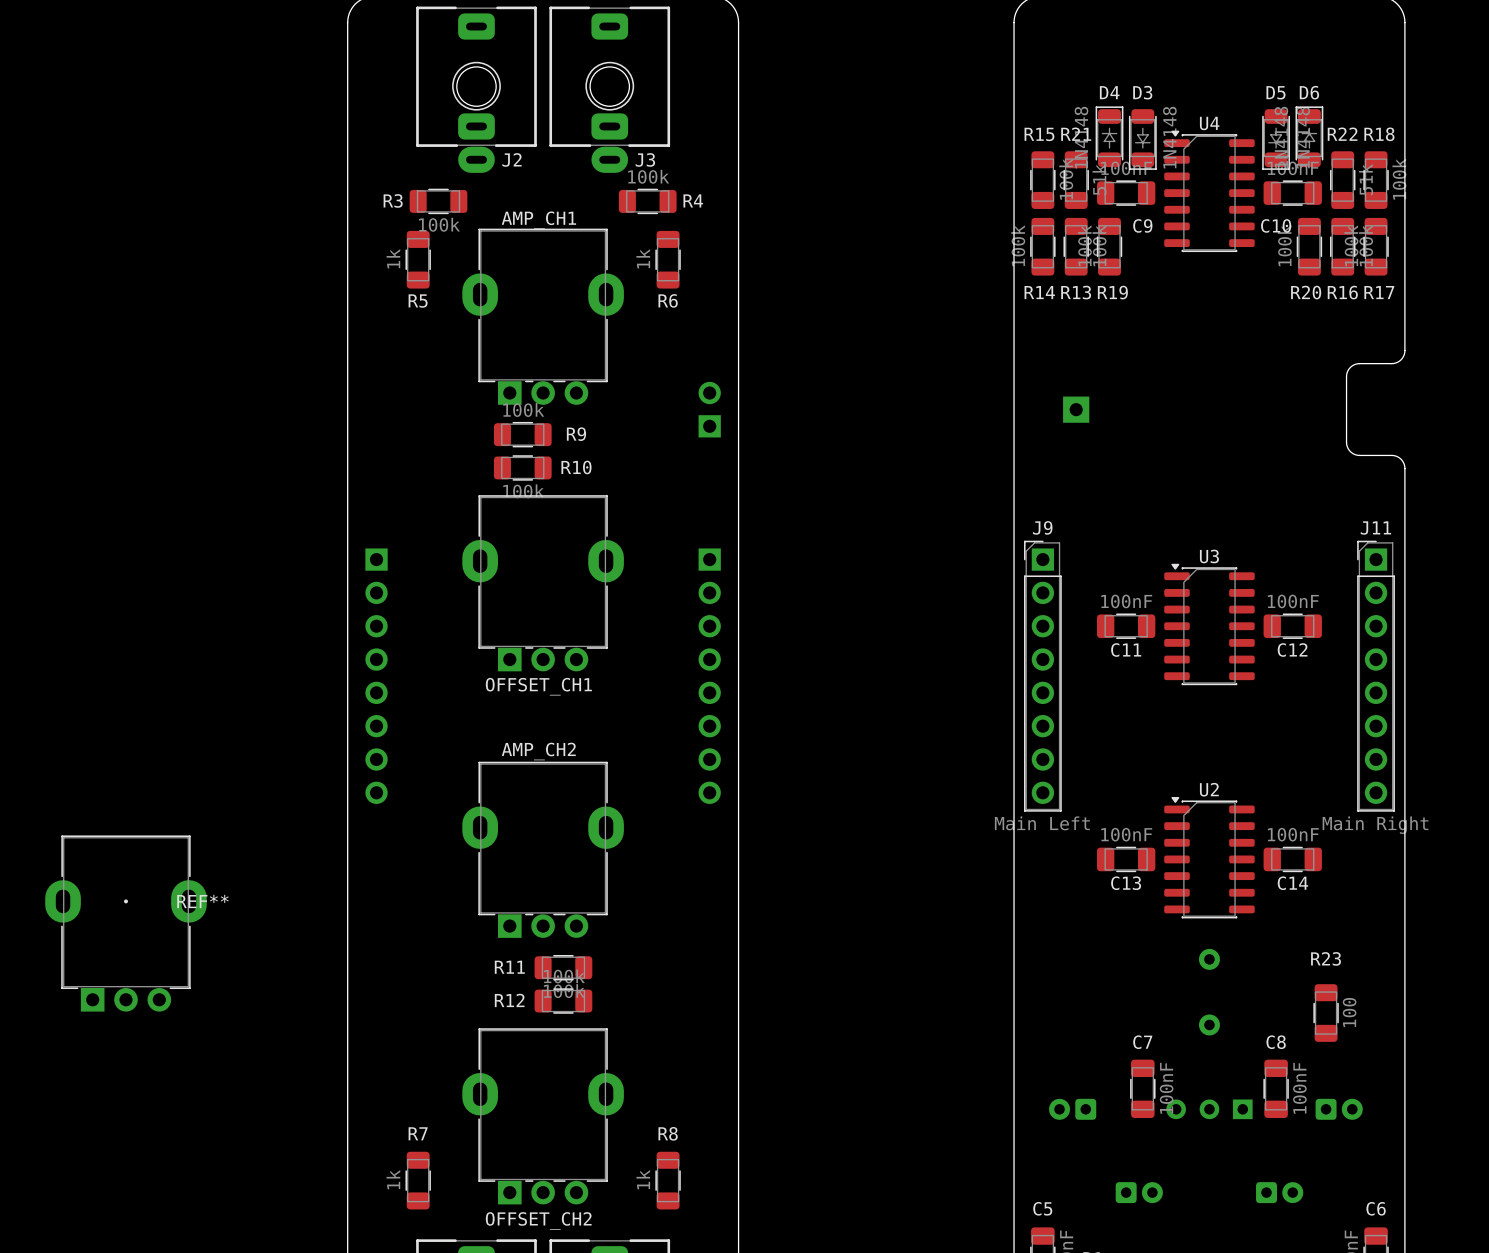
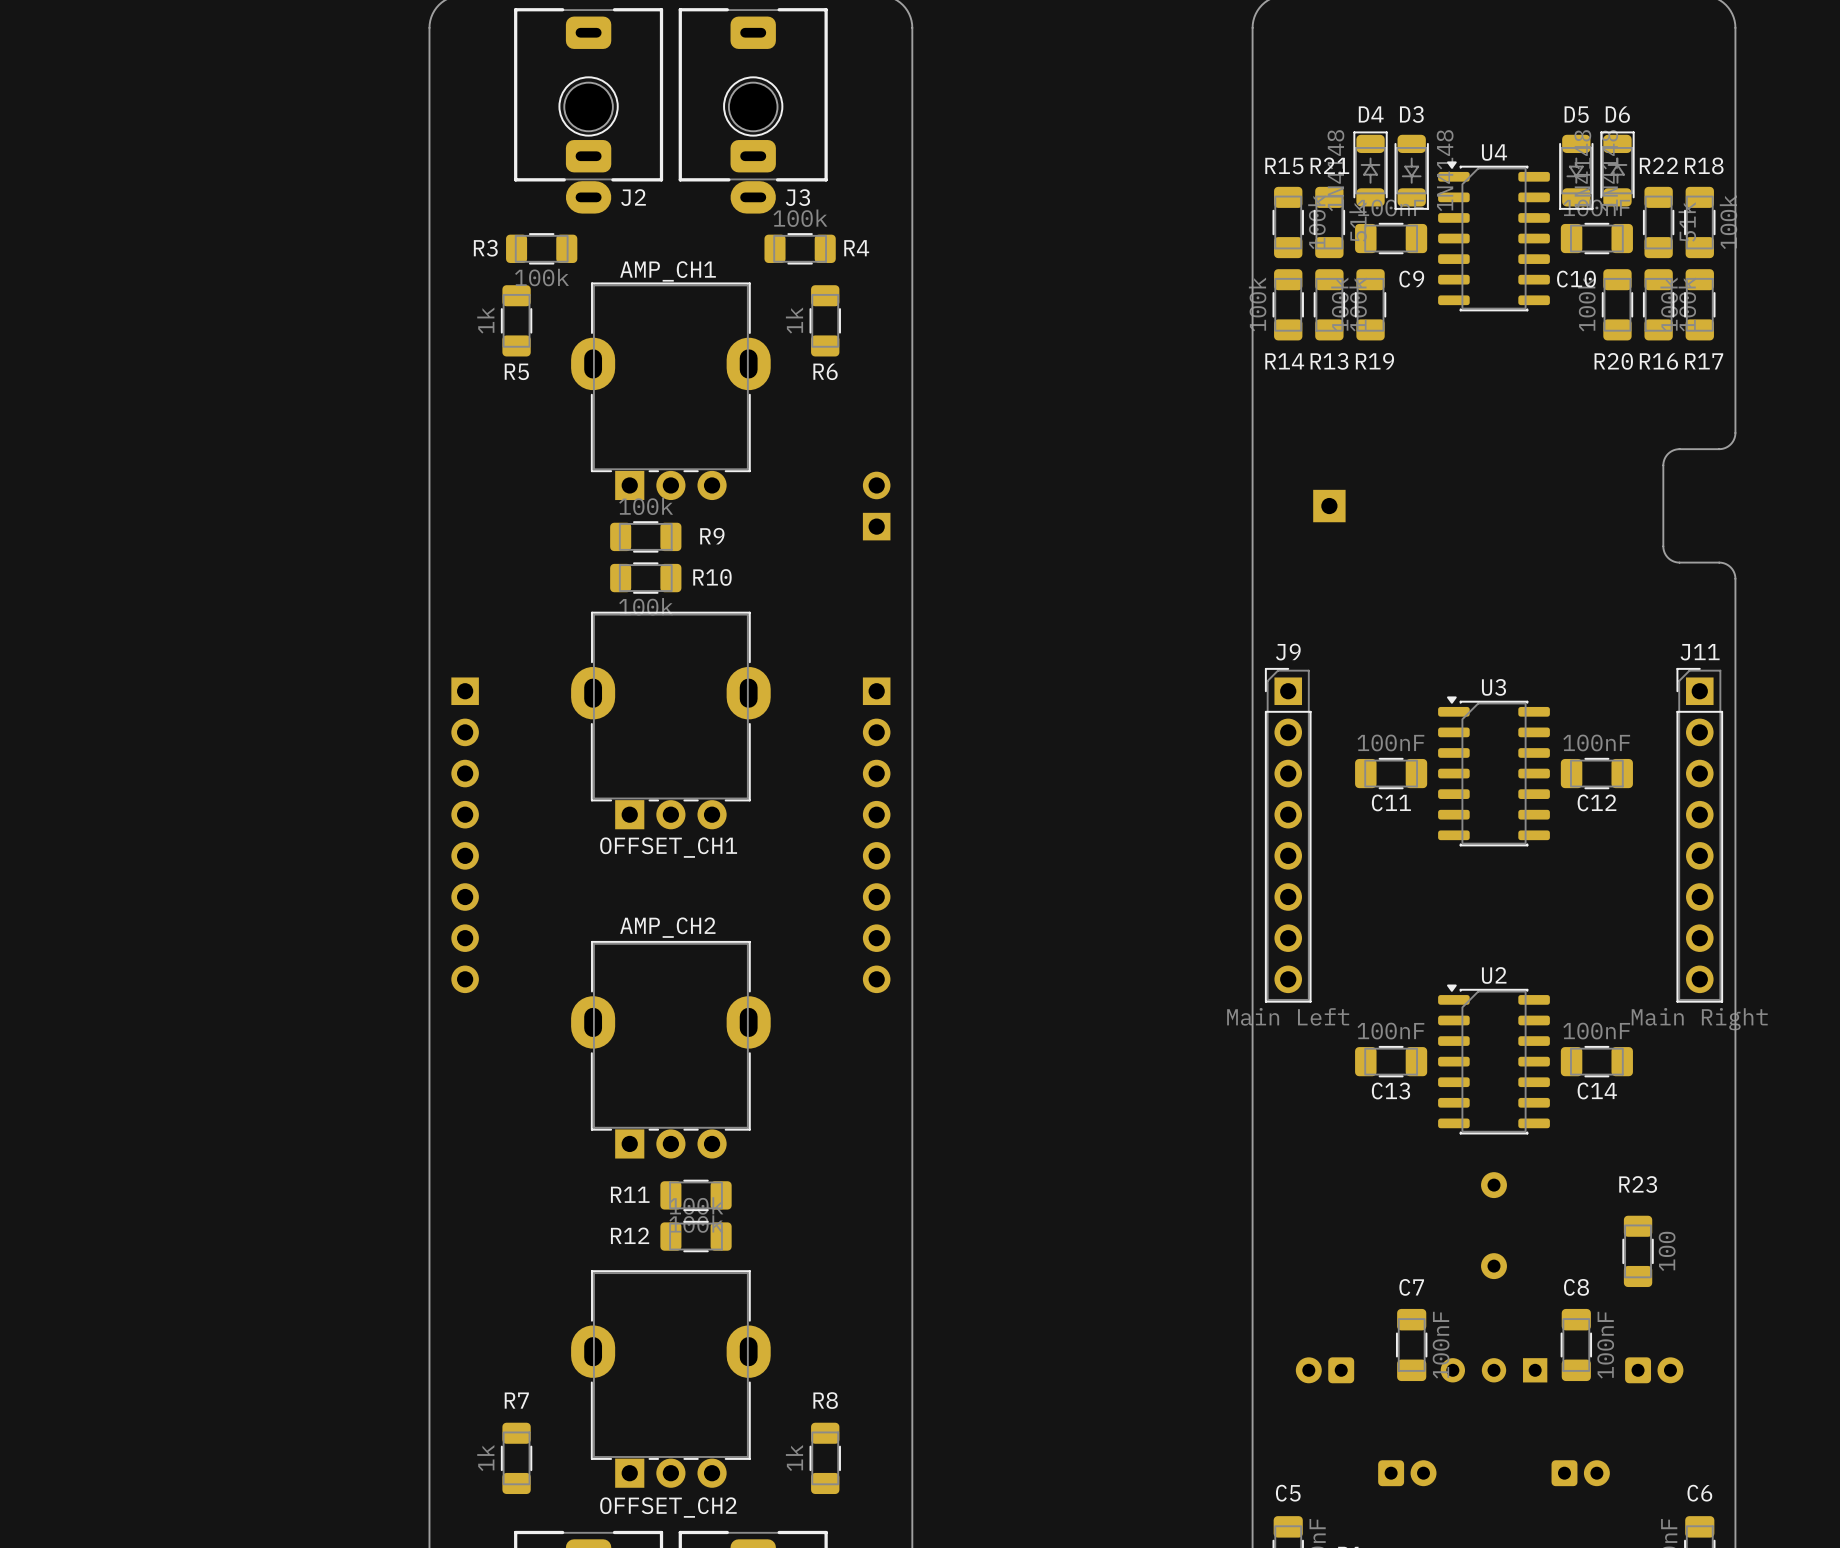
REF**: (126, 923) -> none

